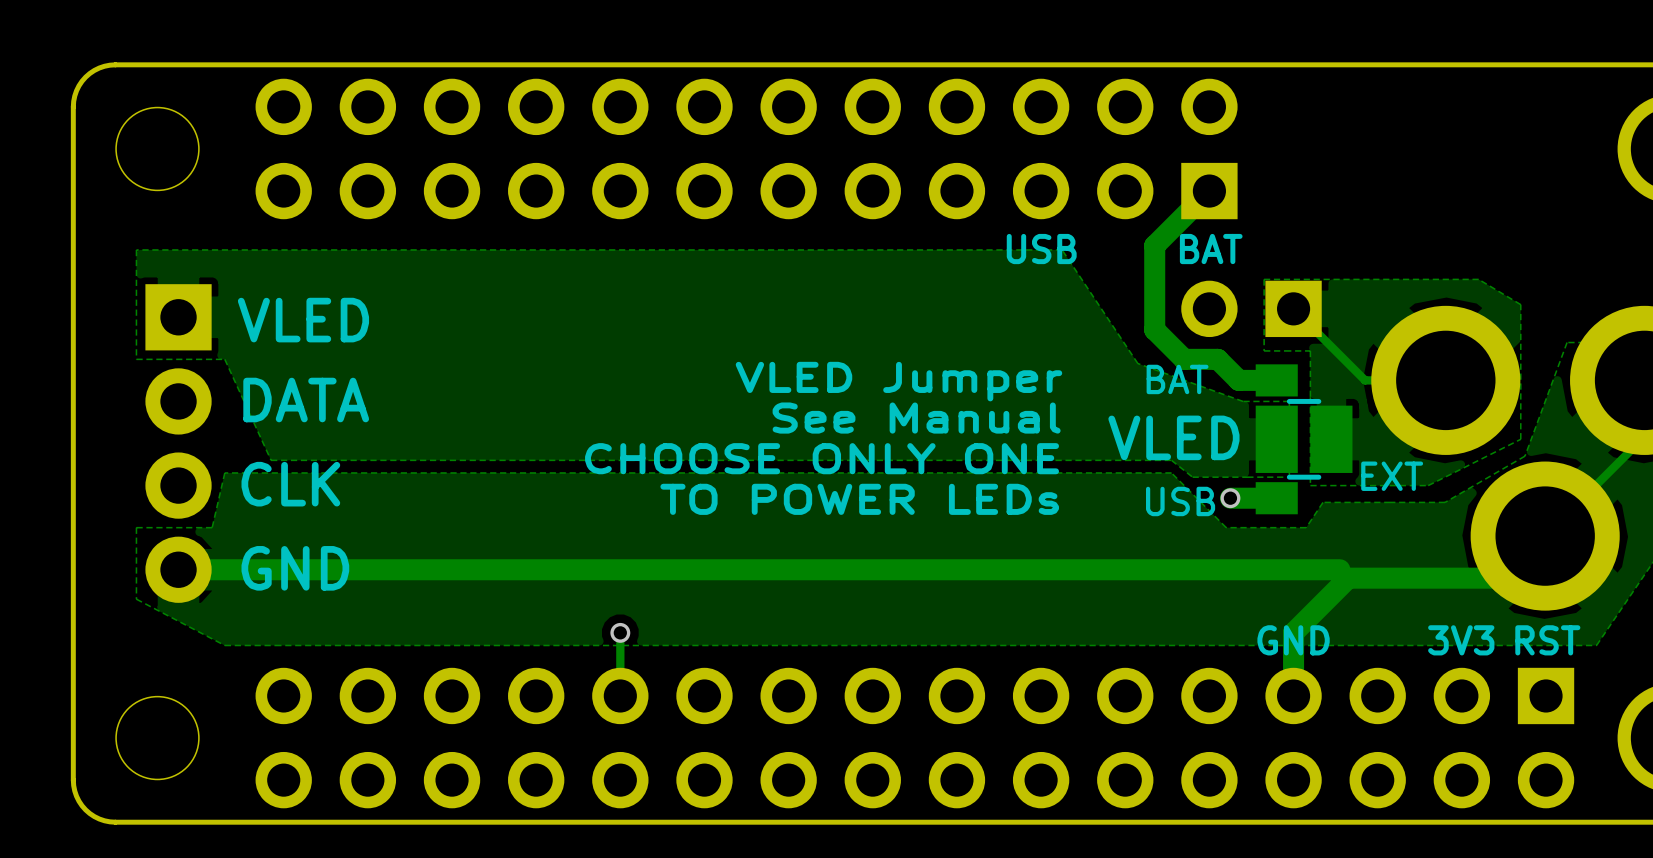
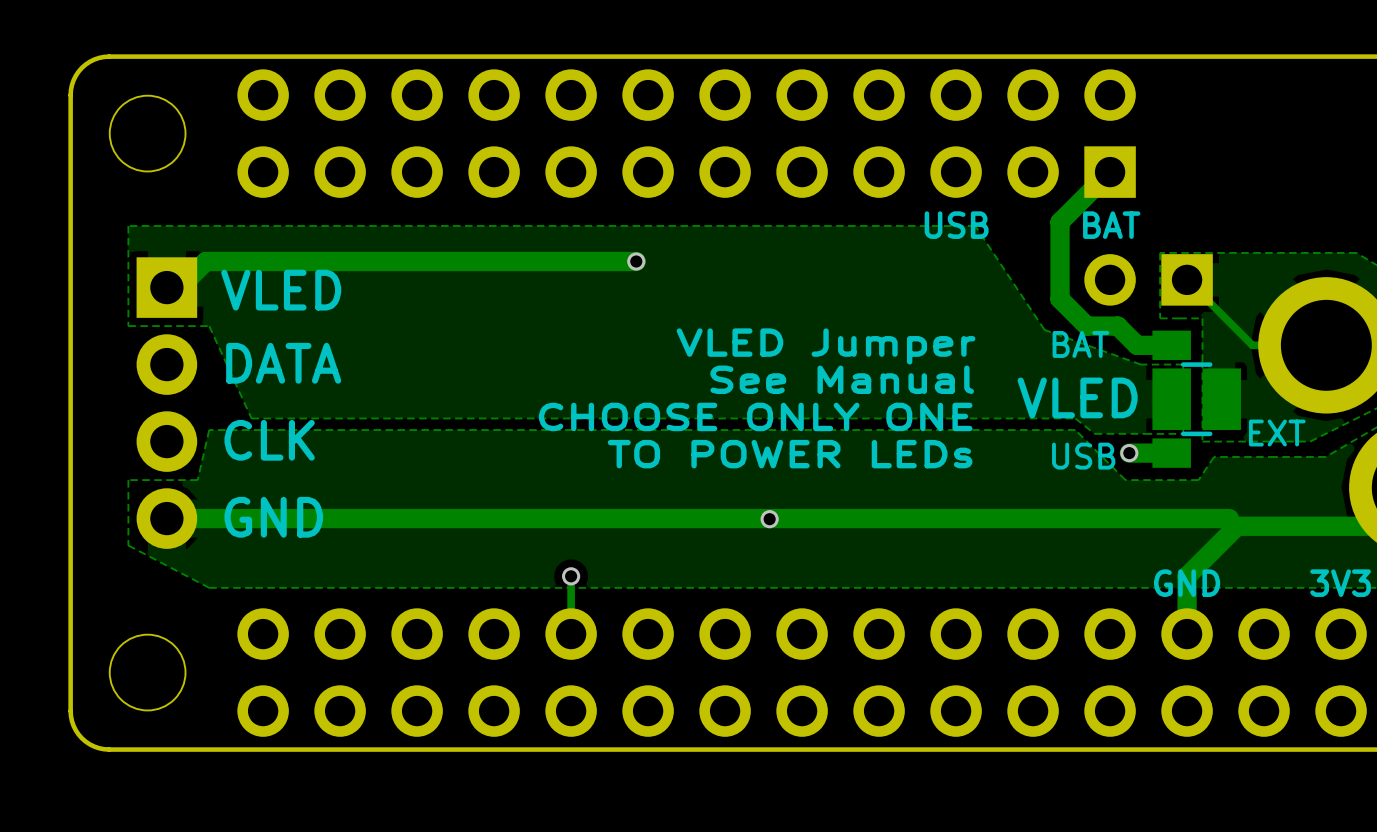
track: none -> (636, 261) (205, 261) (179, 287) (166, 287)
via: none -> (636, 261)
via: none -> (769, 519)

